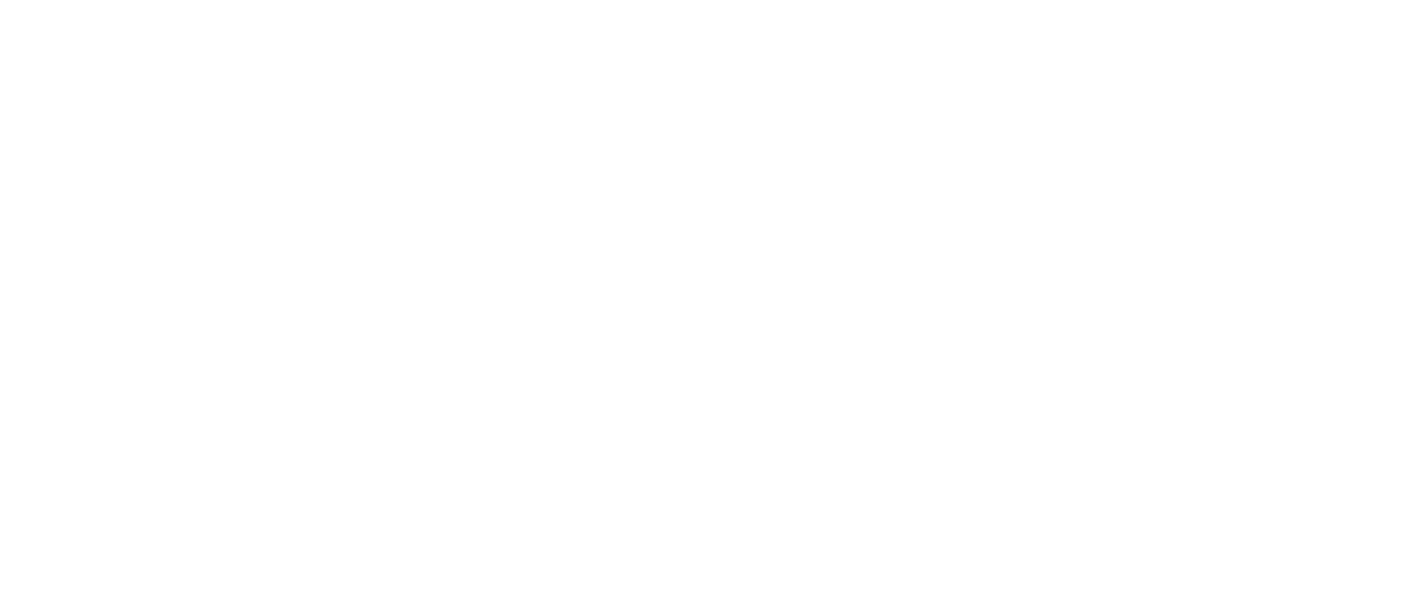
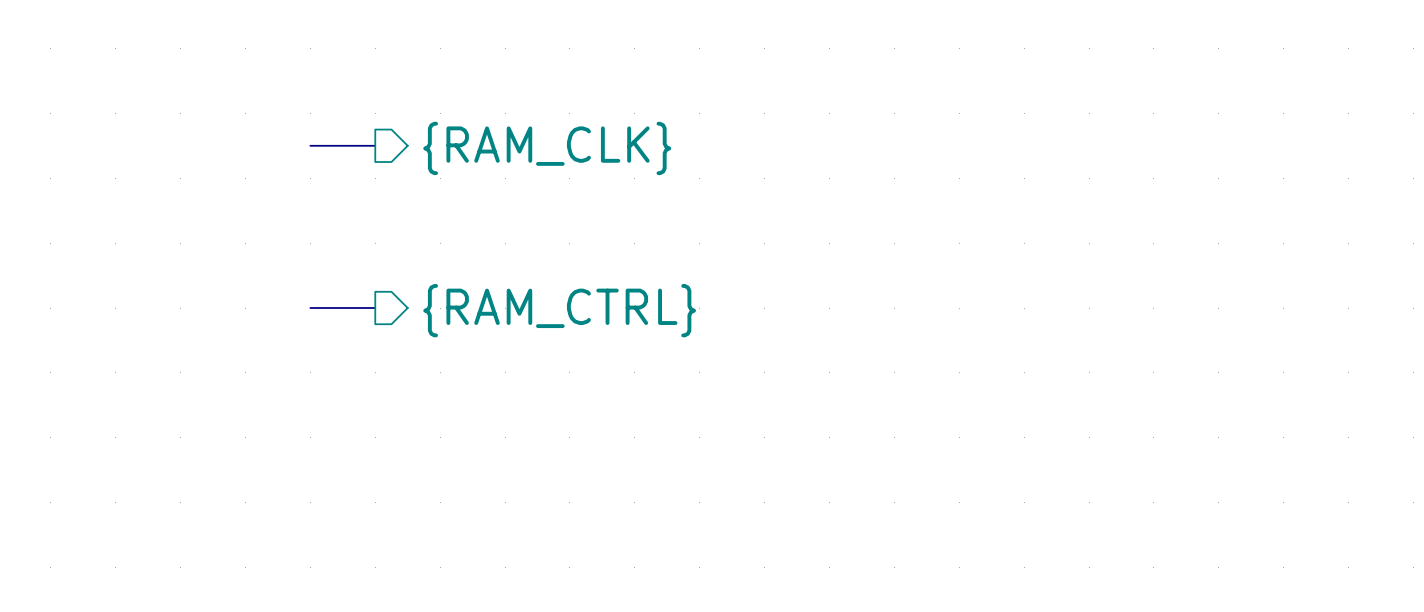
bus: none -> (310, 145) (375, 145)
sheet pin: none -> {RAM_CLK} (547, 148)
bus: none -> (310, 308) (375, 308)
sheet pin: none -> {RAM_CTRL} (559, 310)

